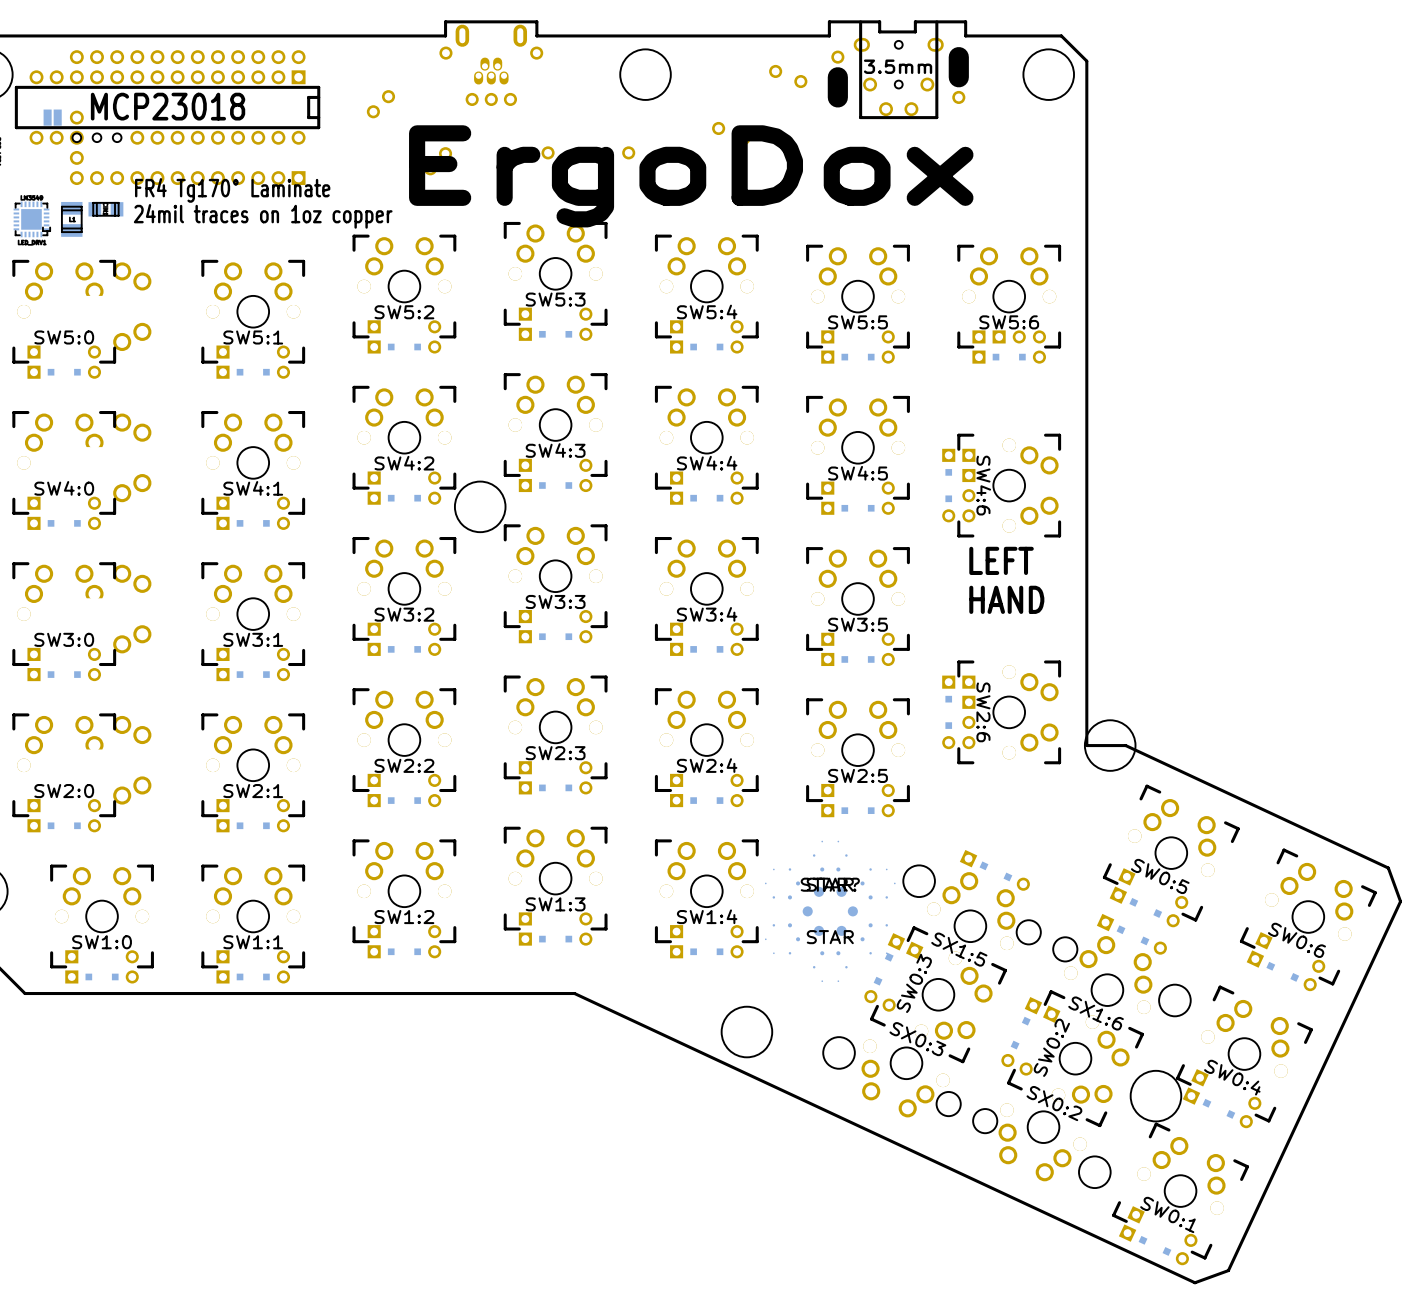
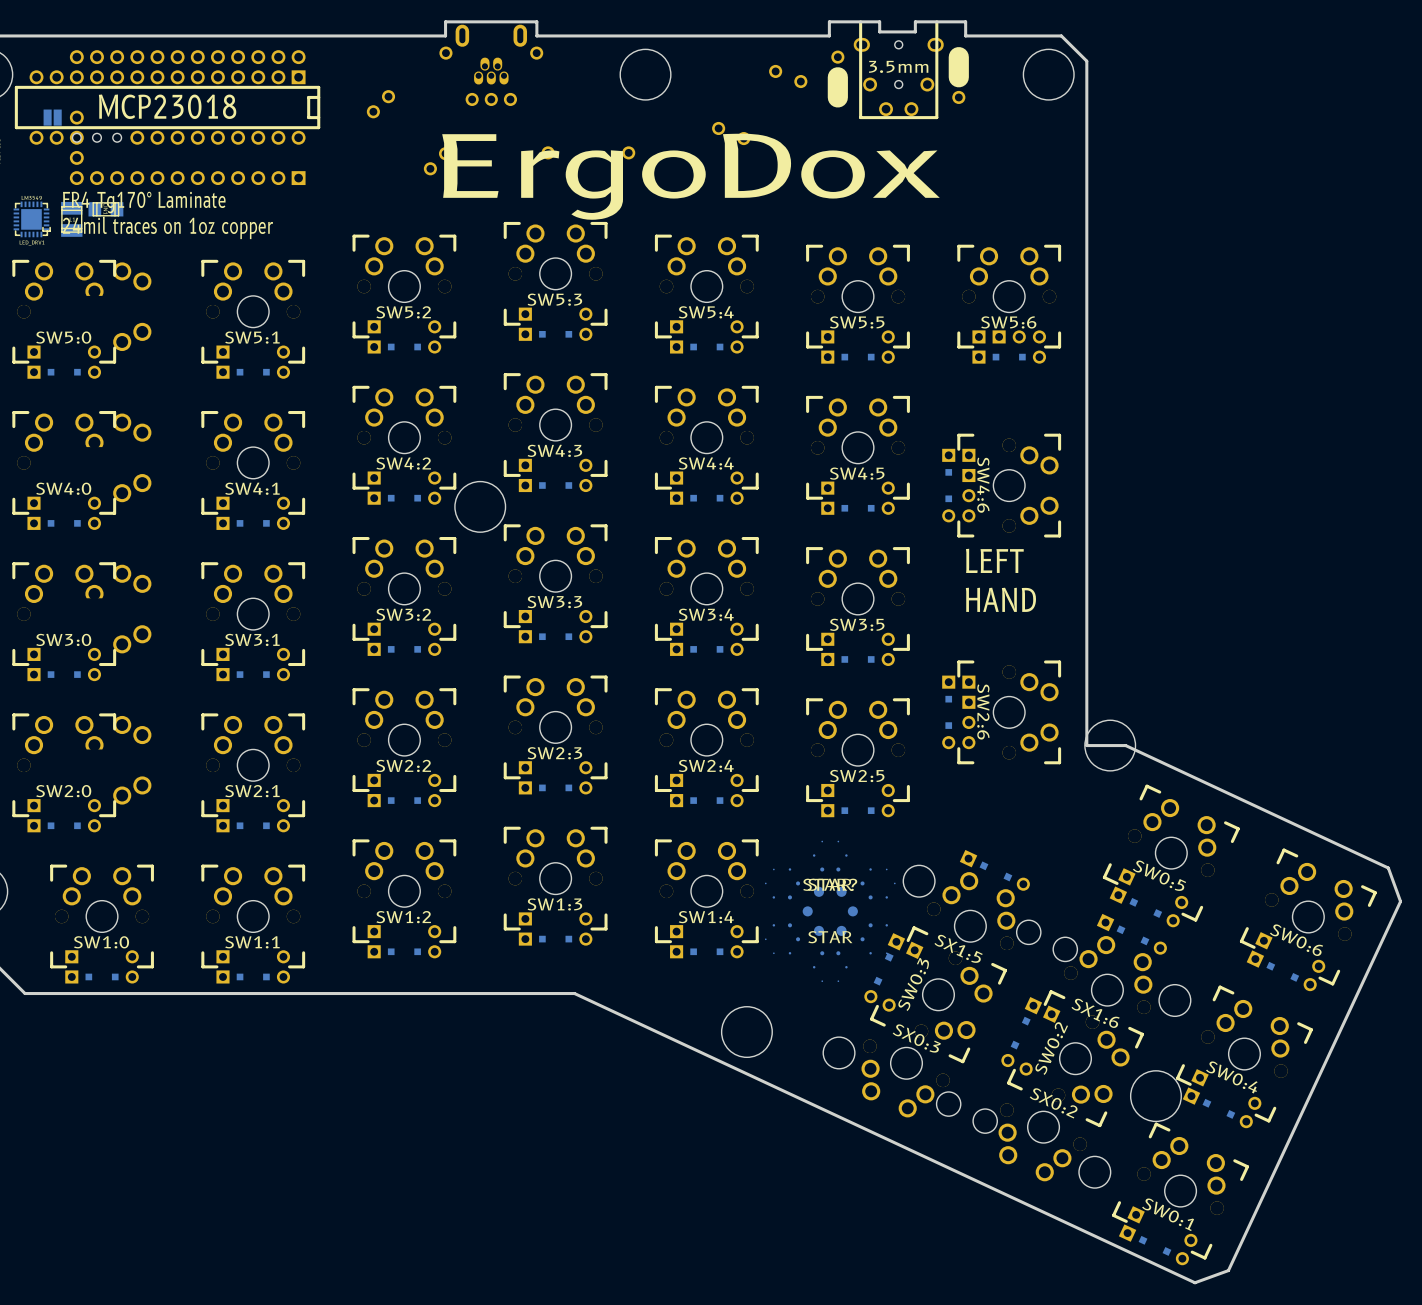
text position: FR4 Tg170° Laminate (232, 190) -> FR4 Tg170° Laminate (144, 202)
text position: 24mil traces on 1oz copper (263, 216) -> 24mil traces on 1oz copper (167, 227)

